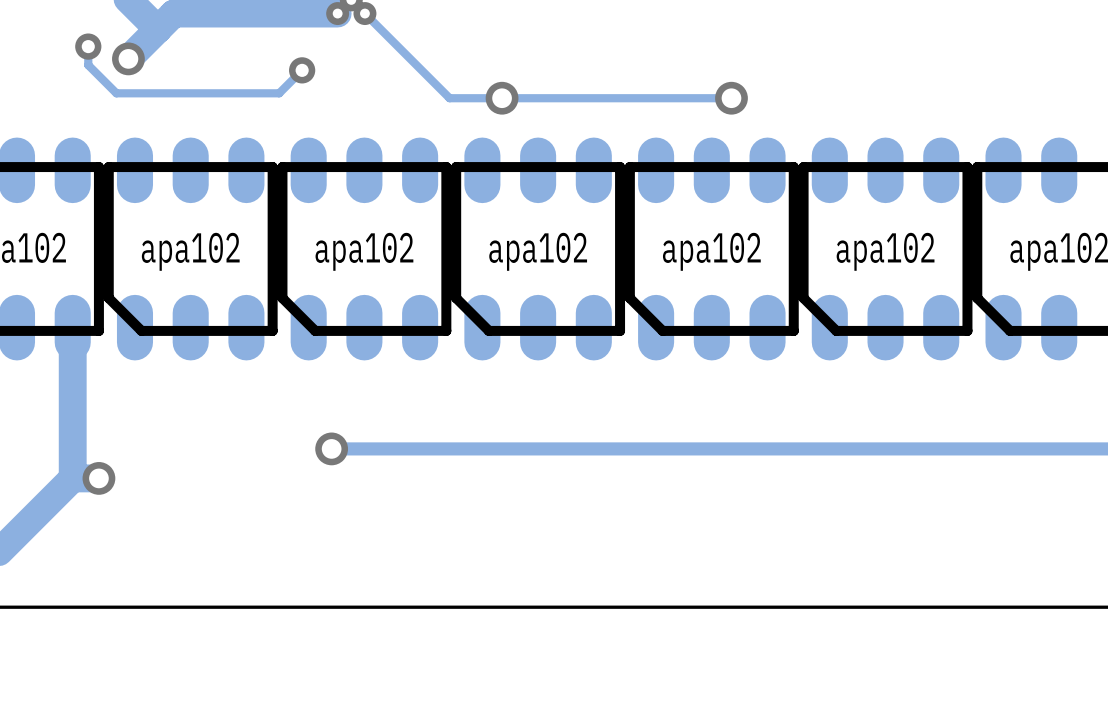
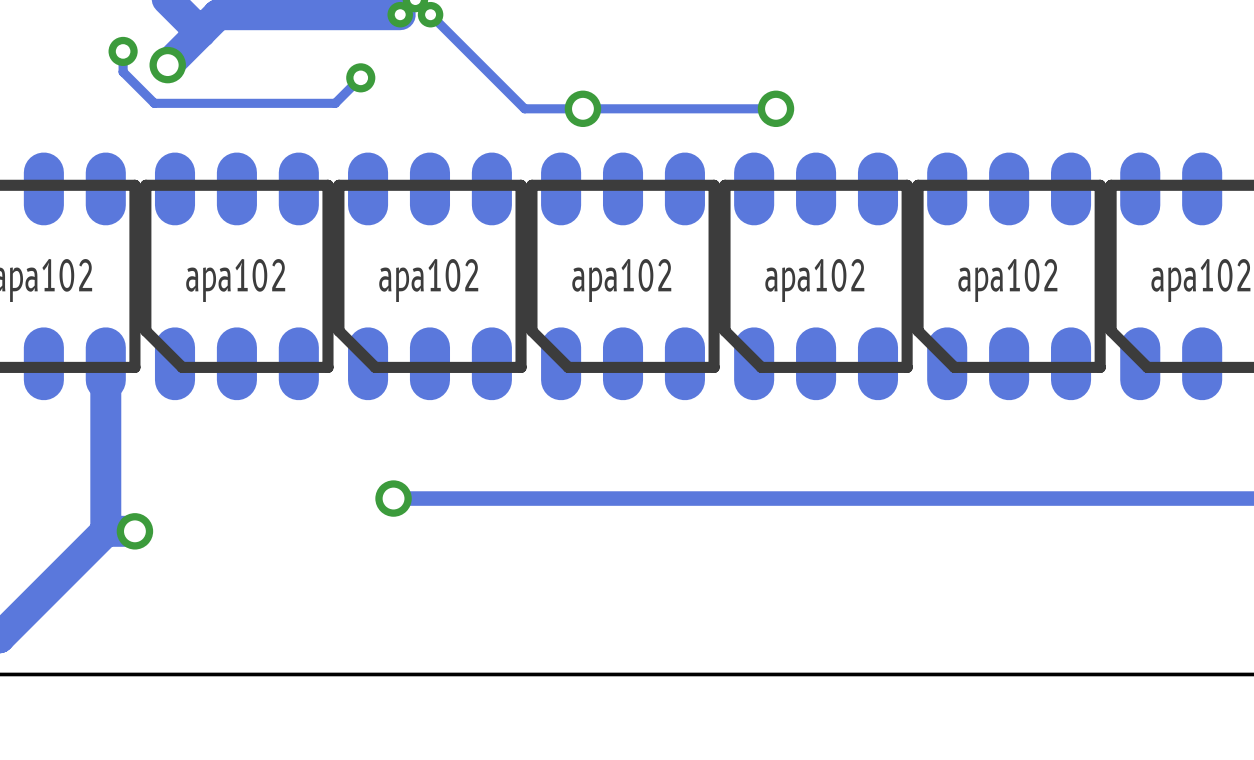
track: (731, 98) (675, 98) -> none
via position: (731, 98) -> (776, 108)

